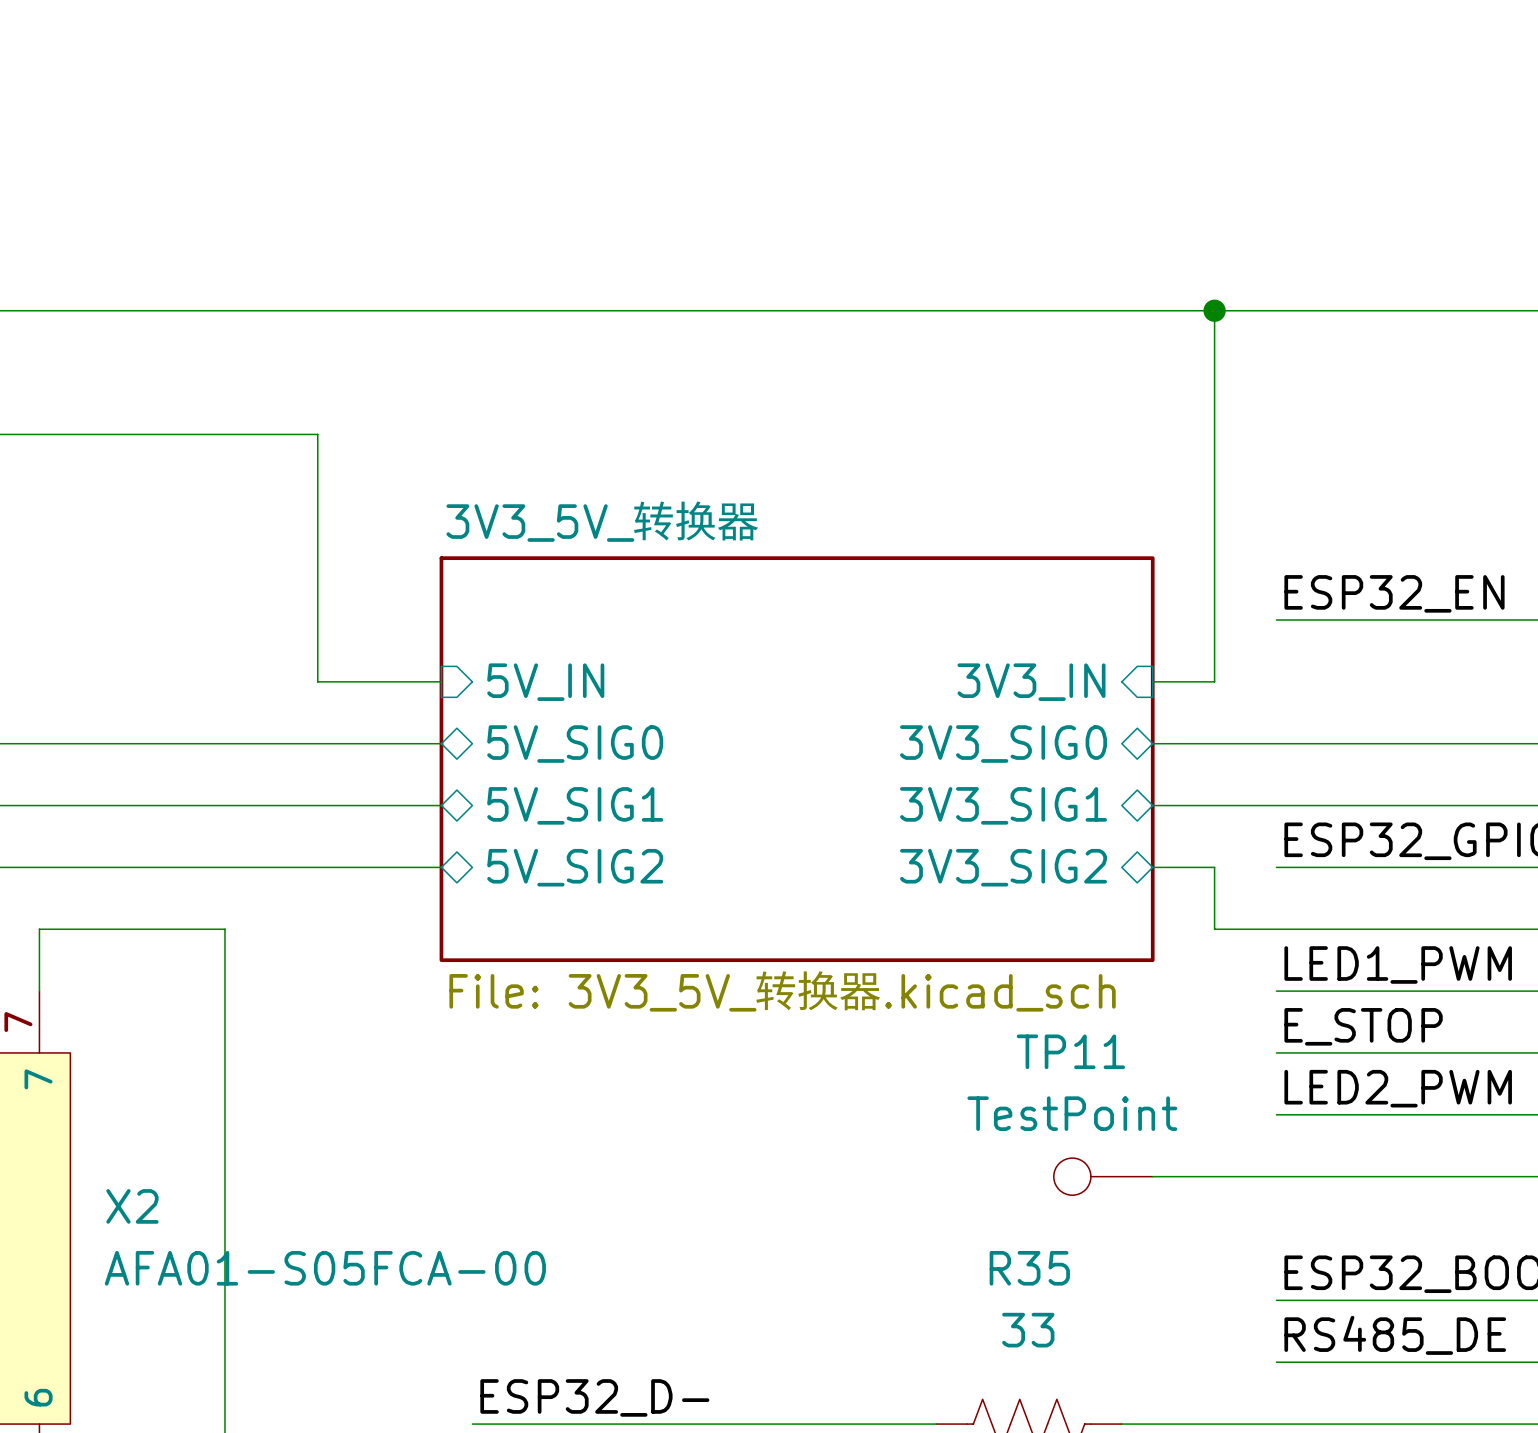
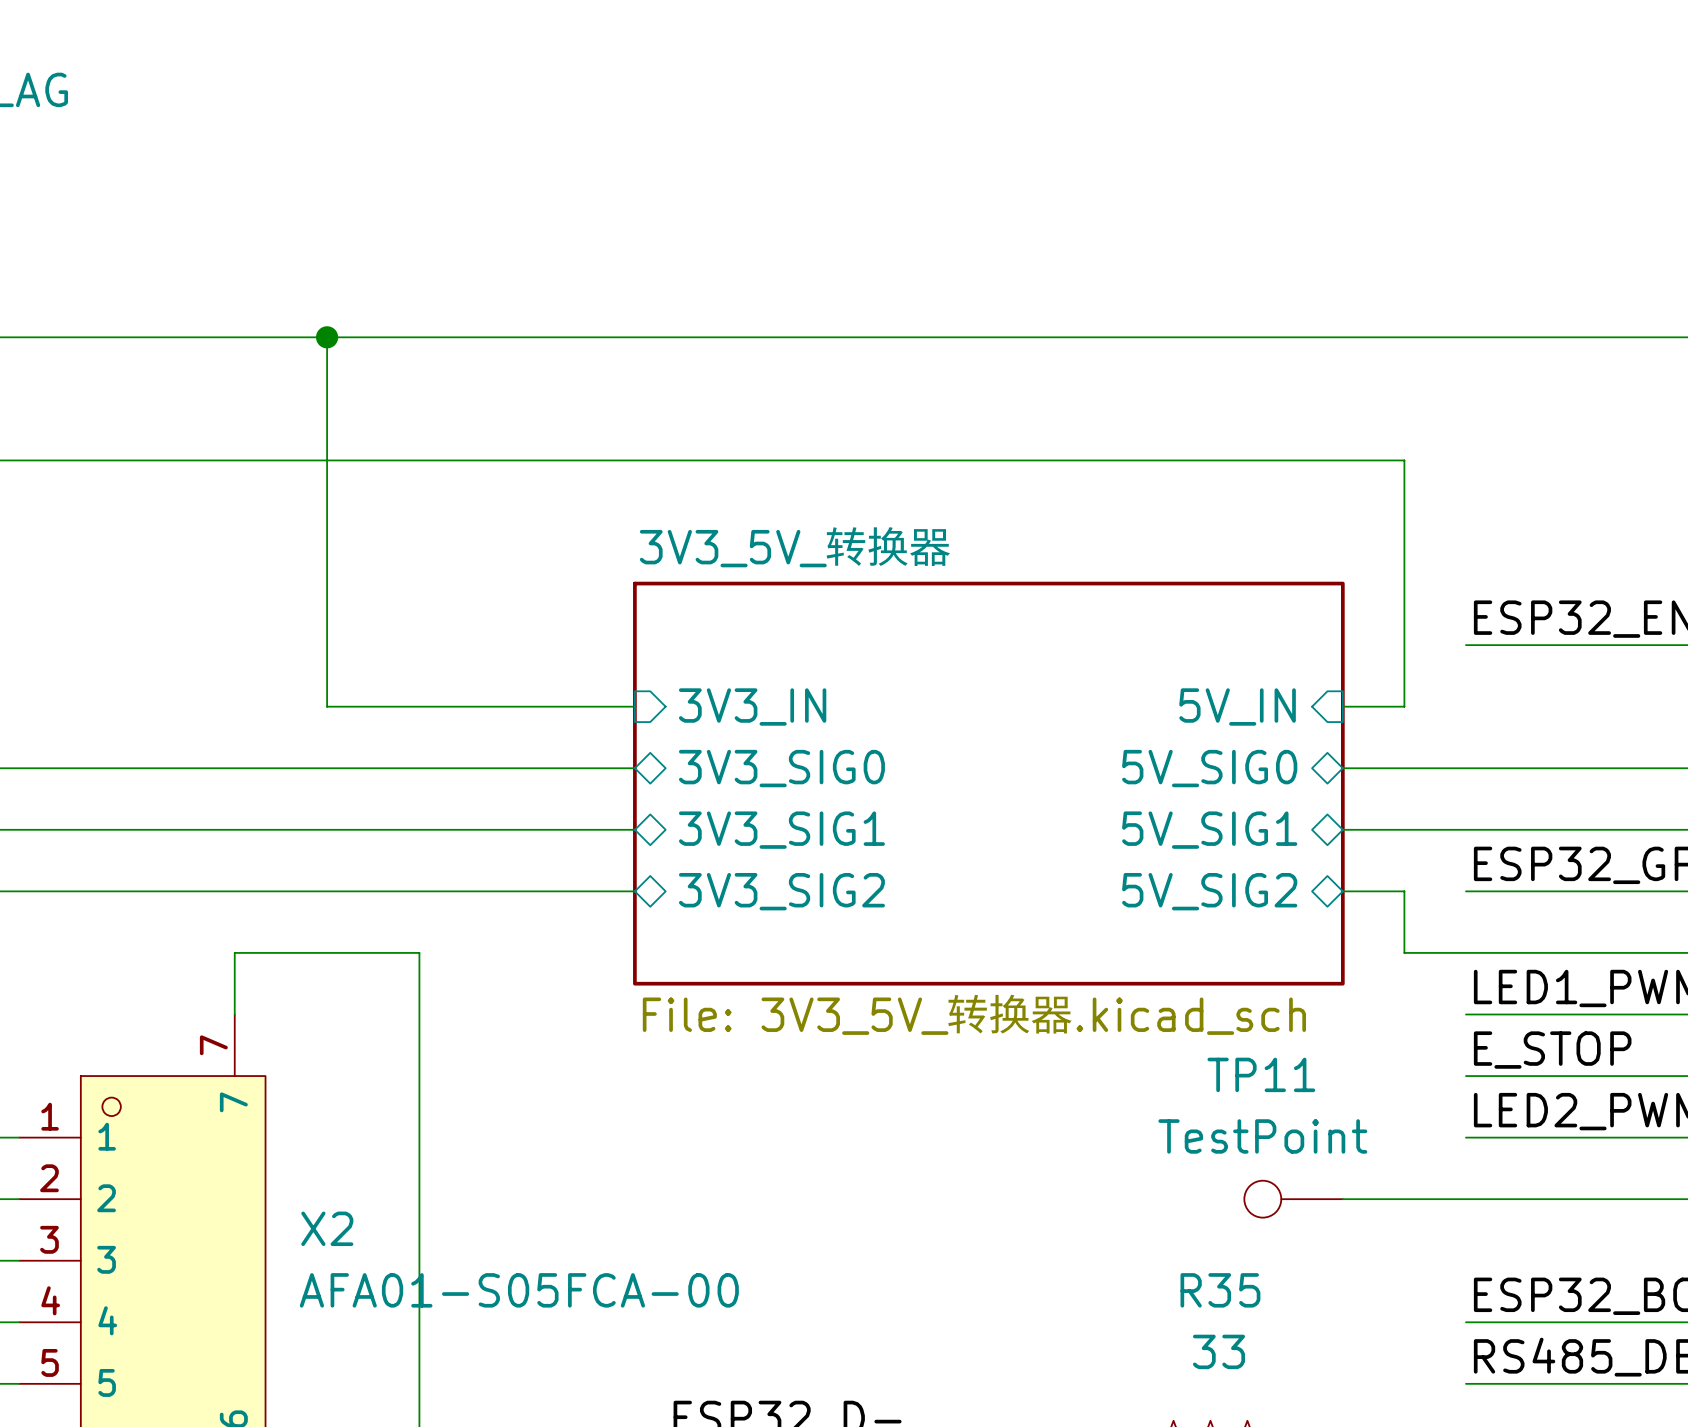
junction: none -> (327, 337)
wire: (1214, 310) (1214, 434) -> (511, 460) (1404, 460)
junction: (1214, 310) -> none
wire: (317, 434) (317, 681) -> (327, 337) (327, 706) (511, 706)
sheet pin: 5V_IN (545, 682) -> 3V3_IN (752, 706)
sheet pin: 3V3_IN (1031, 682) -> 5V_IN (1237, 706)
sheet pin: 5V_SIG0 (575, 744) -> 3V3_SIG0 (781, 768)
sheet pin: 3V3_SIG0 (1003, 744) -> 5V_SIG0 (1209, 768)
sheet pin: 5V_SIG1 (575, 805) -> 3V3_SIG1 (781, 830)
sheet pin: 3V3_SIG1 (1003, 805) -> 5V_SIG1 (1209, 830)
sheet pin: 5V_SIG2 (575, 867) -> 3V3_SIG2 (781, 891)
sheet pin: 3V3_SIG2 (1003, 867) -> 5V_SIG2 (1209, 891)

